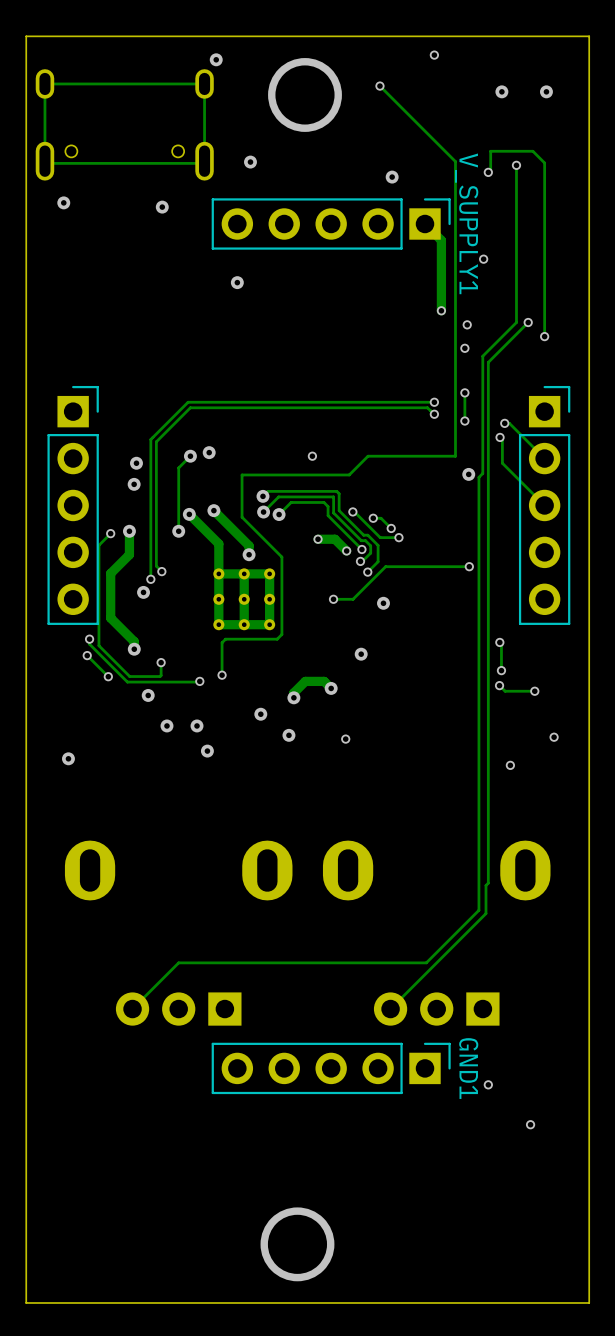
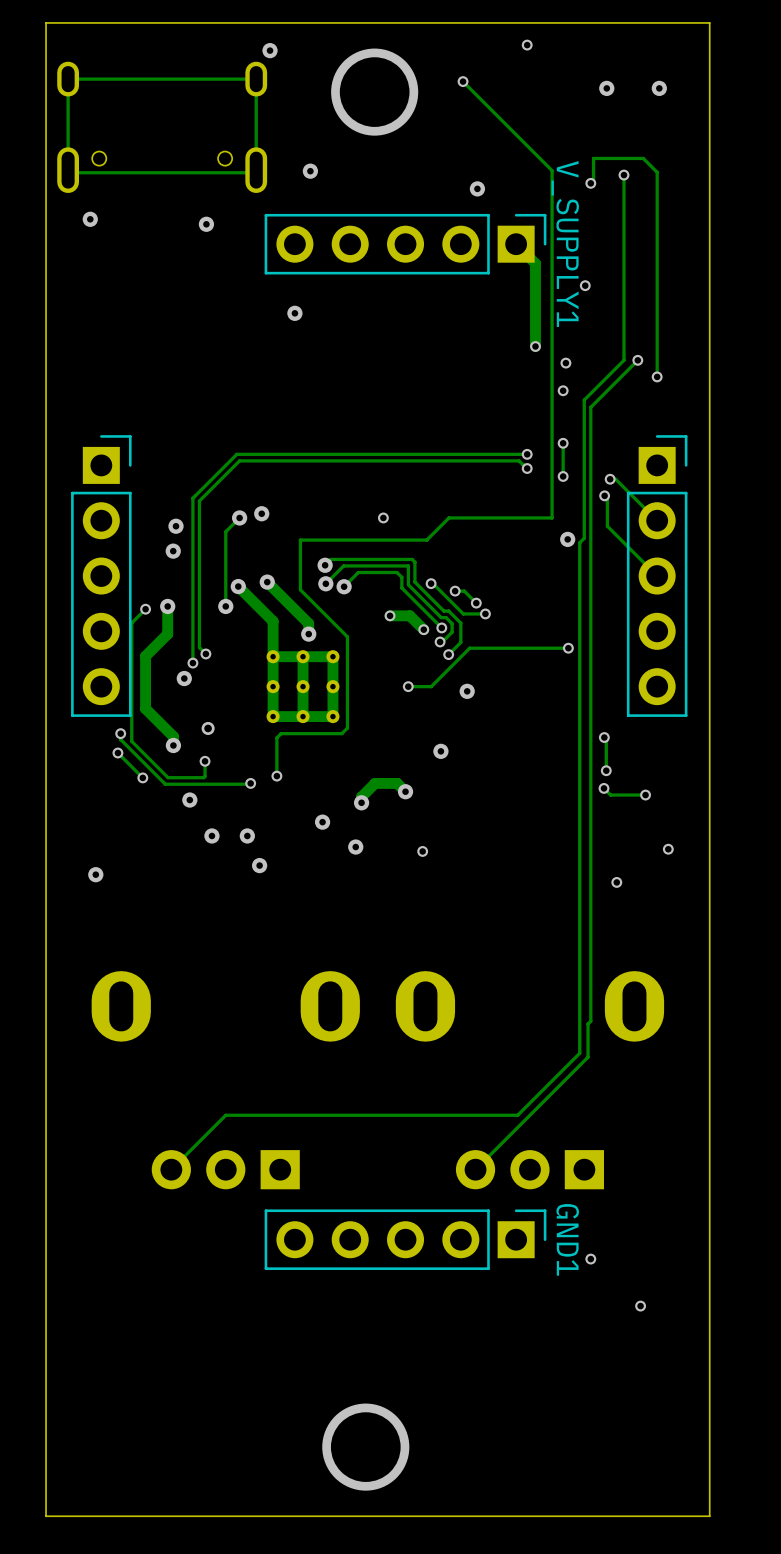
via: none -> (208, 728)

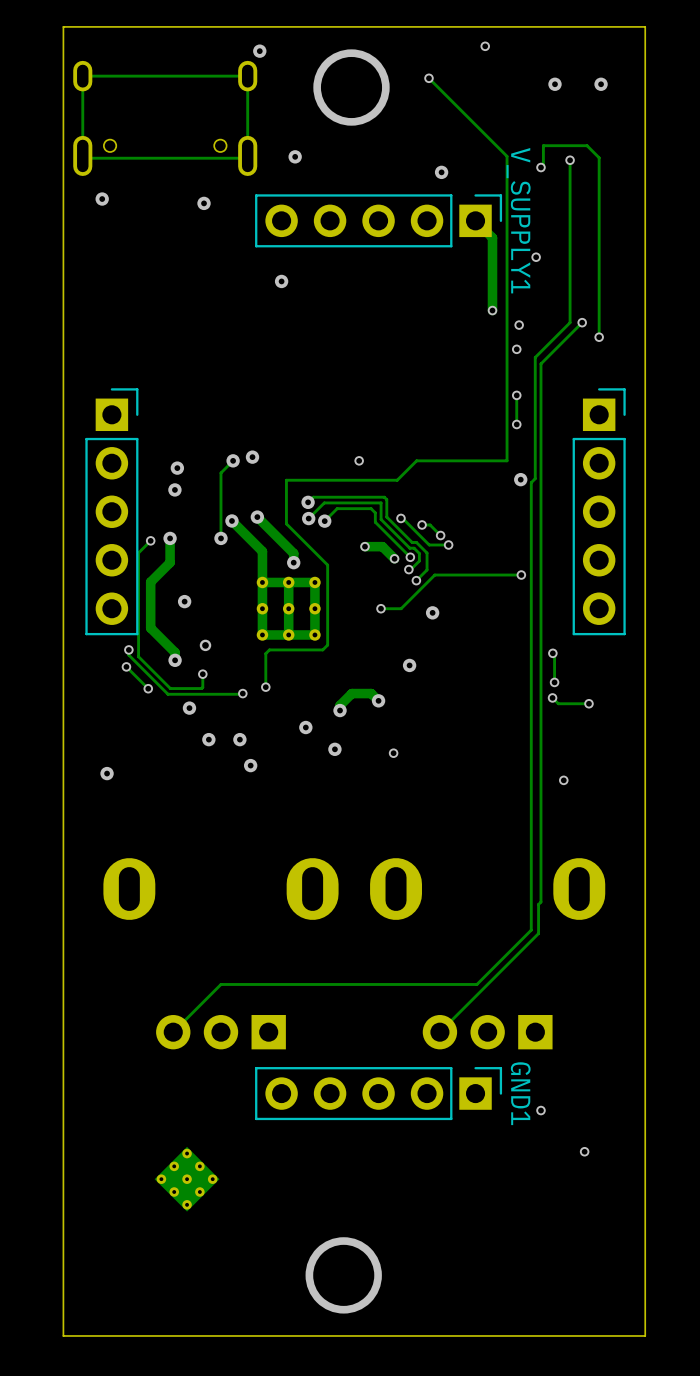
track: (527, 454) (236, 454) (192, 498) (192, 663) -> none
via: (527, 454) -> none
track: (527, 468) (519, 460) (239, 460) (199, 500) (199, 647) (205, 653) -> none
via: (527, 468) -> none
track: (610, 479) (615, 479) (657, 520) -> none
via: (610, 479) -> none
track: (604, 495) (607, 498) (607, 526) (657, 576) -> none
via: (604, 495) -> none
via: (205, 653) -> none
via: (192, 663) -> none
via: (668, 849) -> none
part: none -> (187, 1179)

